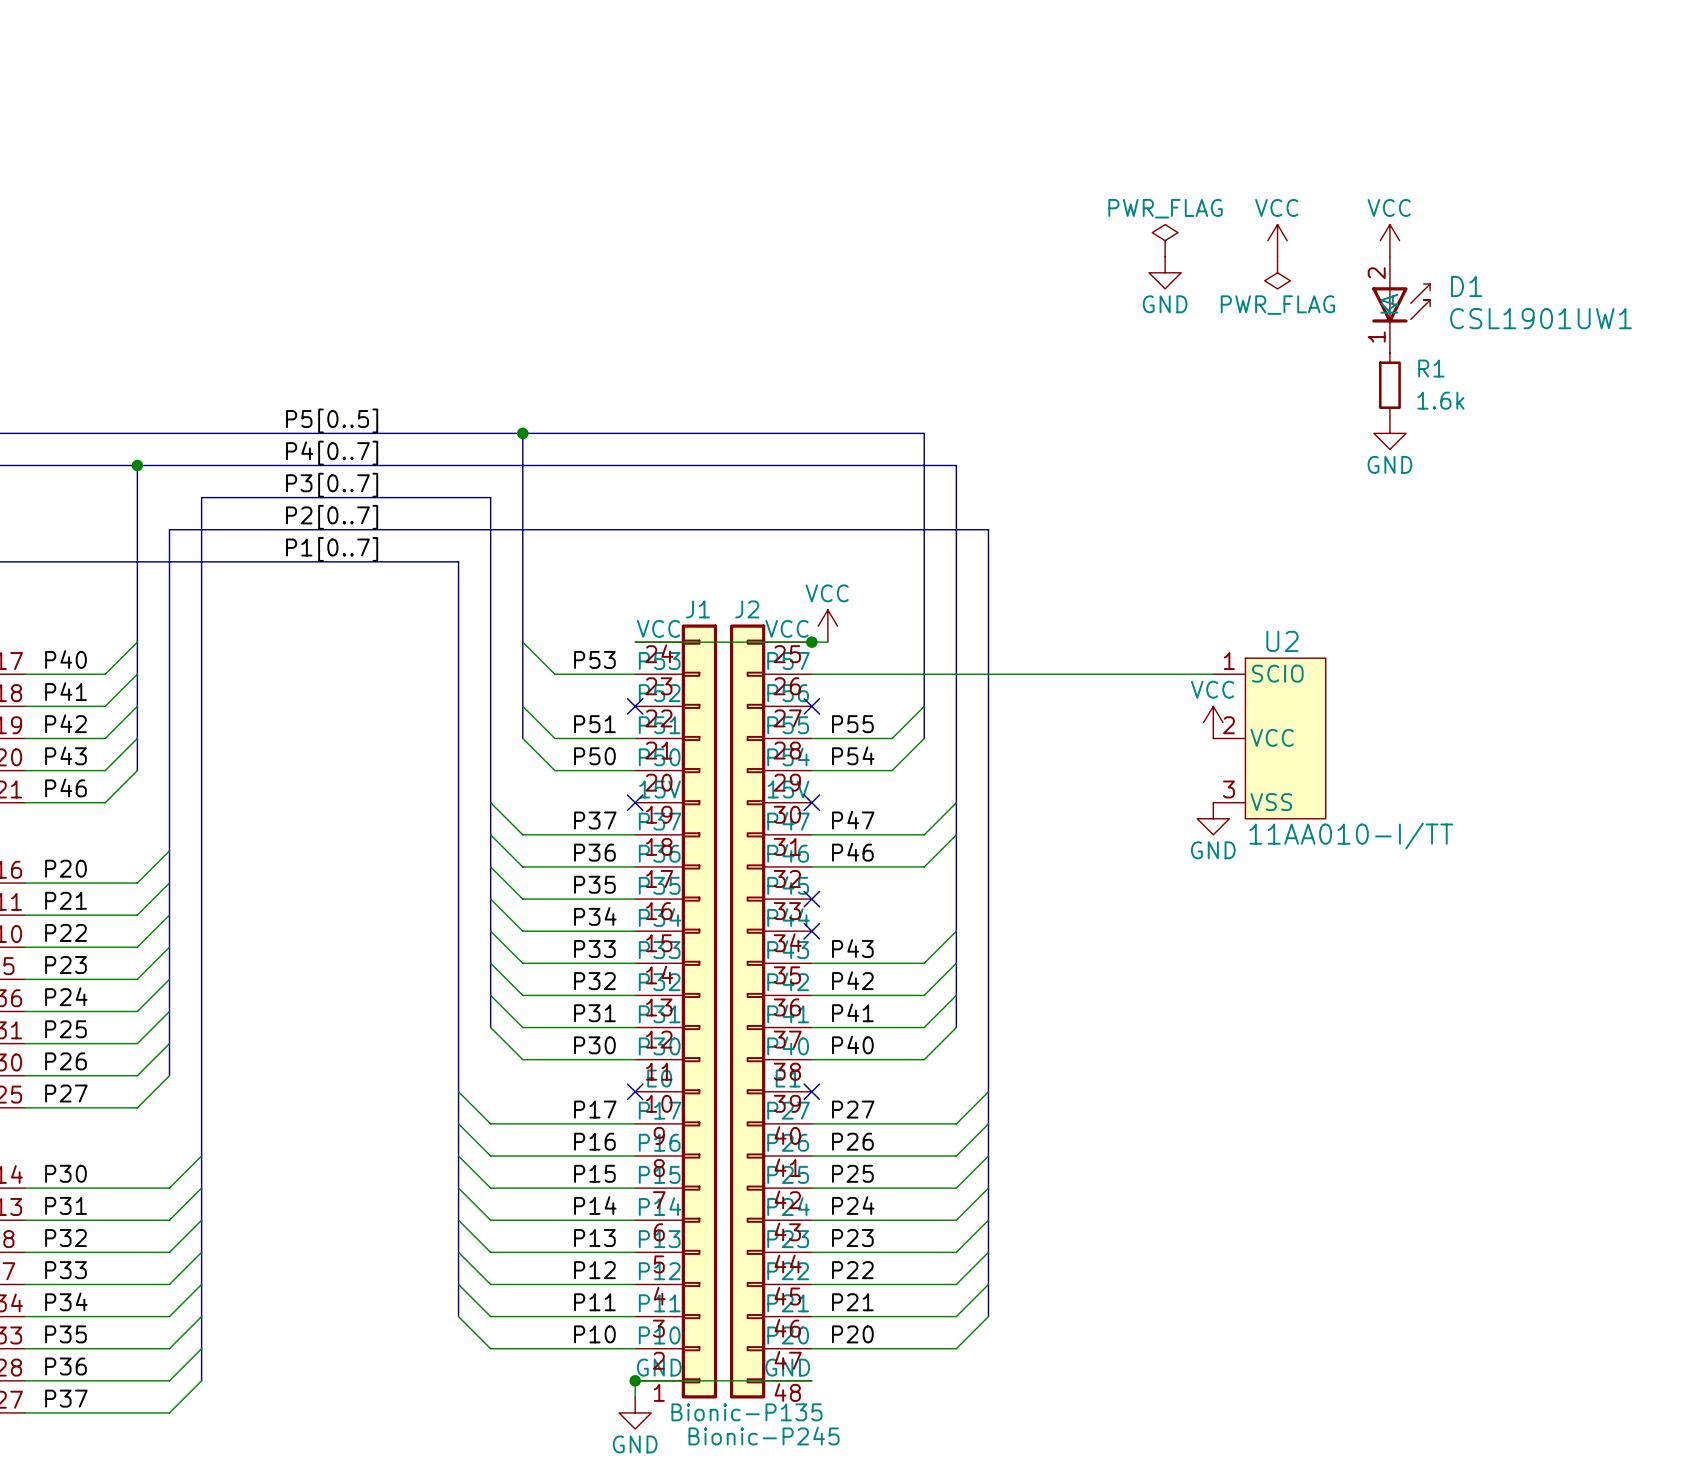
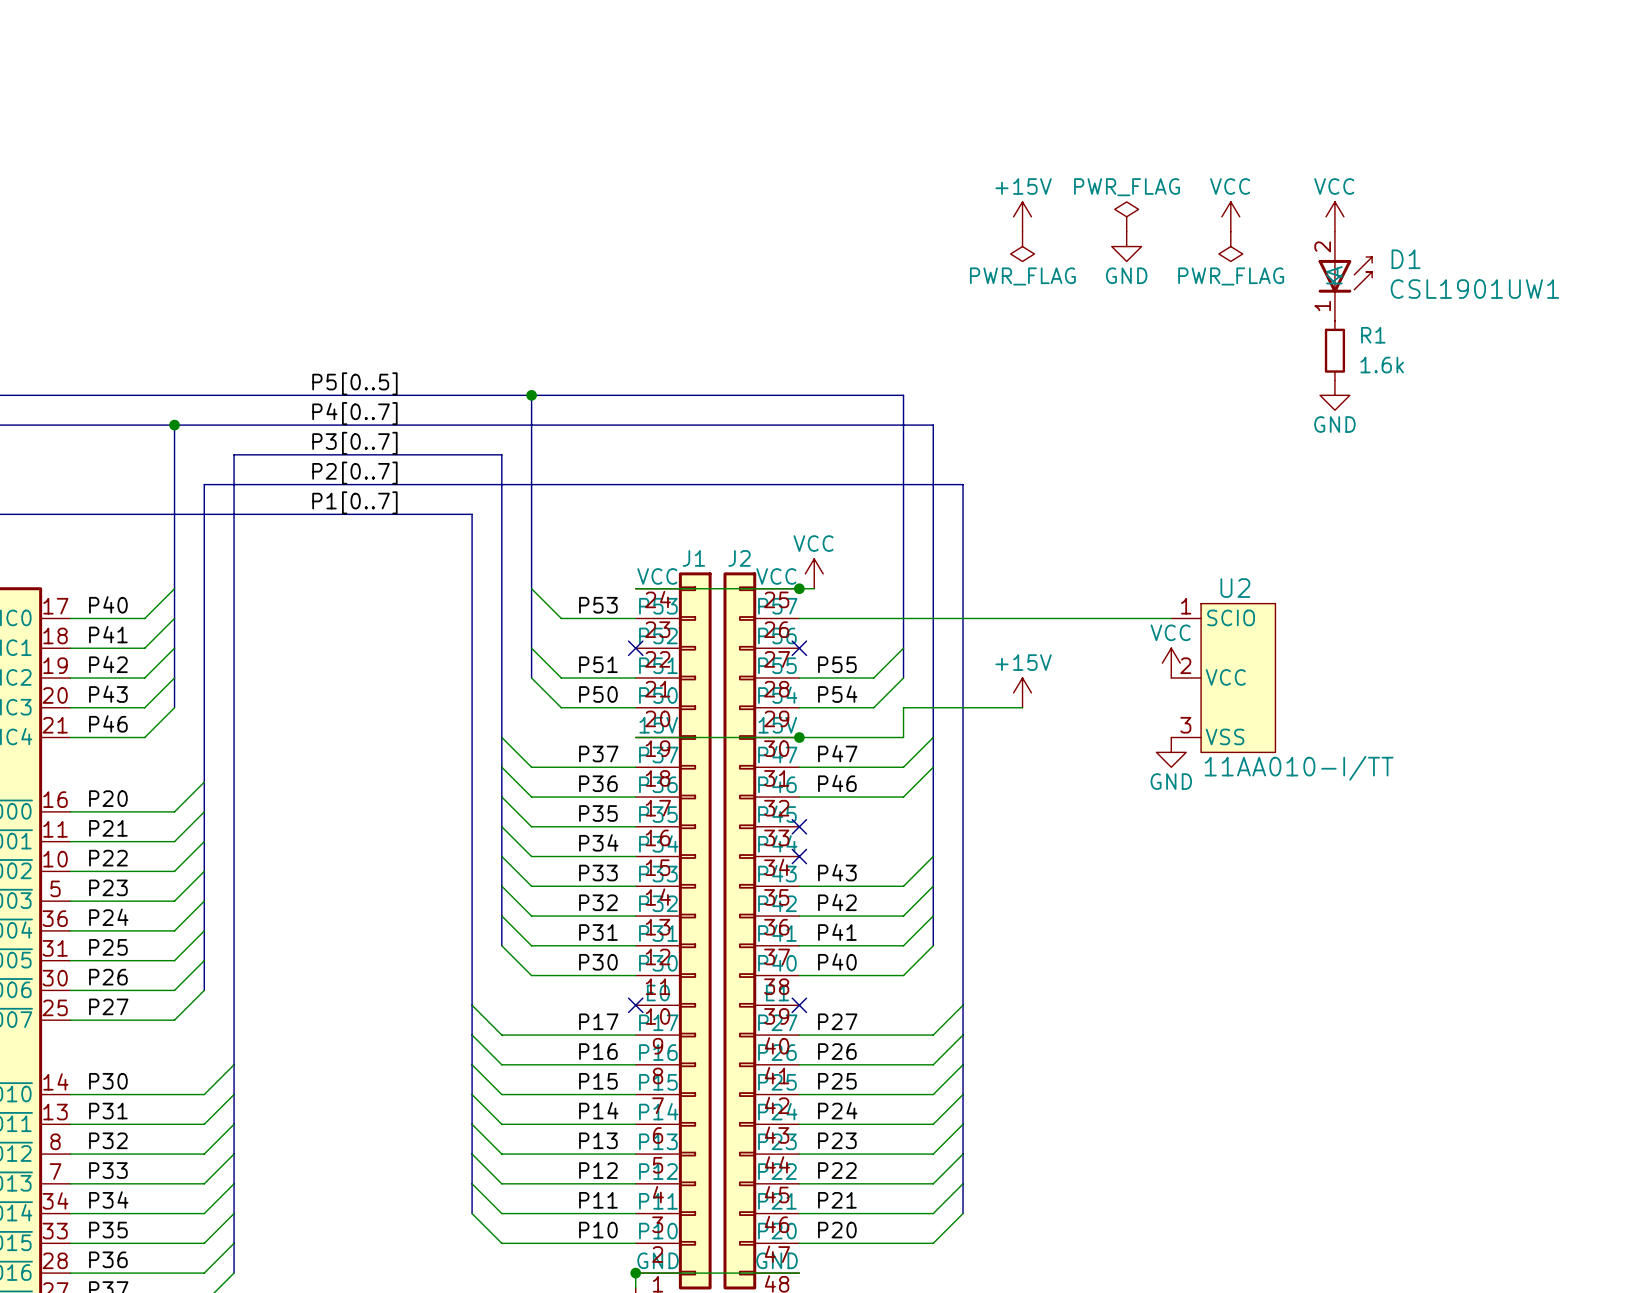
power symbol: none -> +15V (1022, 216)
power symbol: none -> PWR_FLAG (1022, 246)
power symbol: none -> +15V (1022, 692)
wire: none -> (1022, 707) (903, 707) (903, 737) (635, 737)
no-connect mark: (635, 802) -> none
no-connect mark: (811, 802) -> none
junction: none -> (799, 737)

